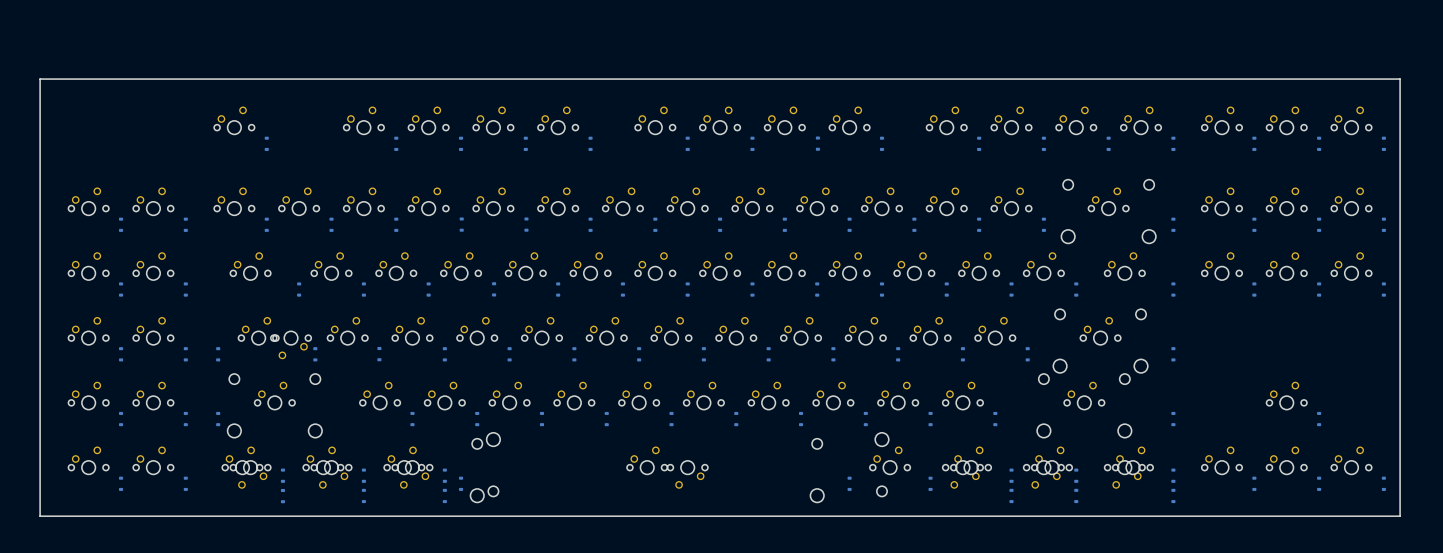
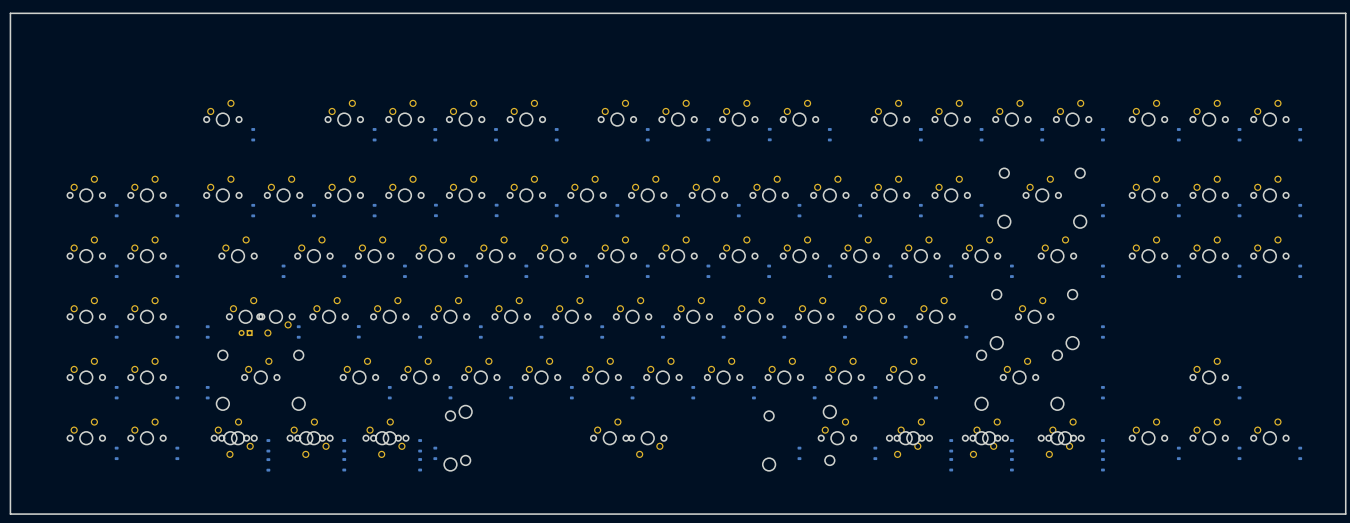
board edge: (40, 79) (1400, 79) (1400, 516) (40, 516) (40, 79) -> (10, 13) (10, 514) (1345, 514) (1345, 13) (10, 13)
part: none -> (245, 316)

